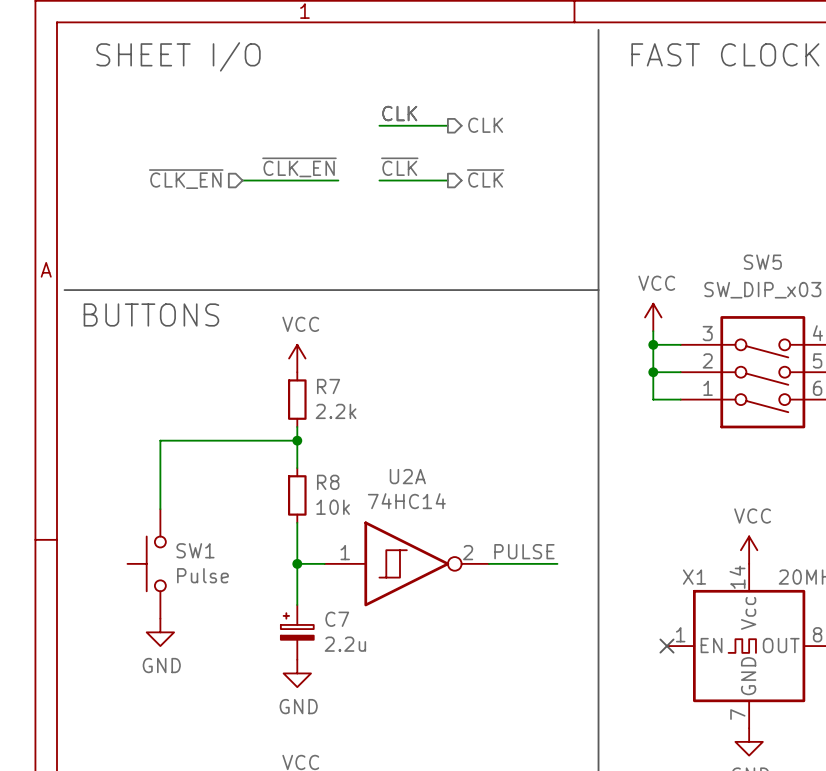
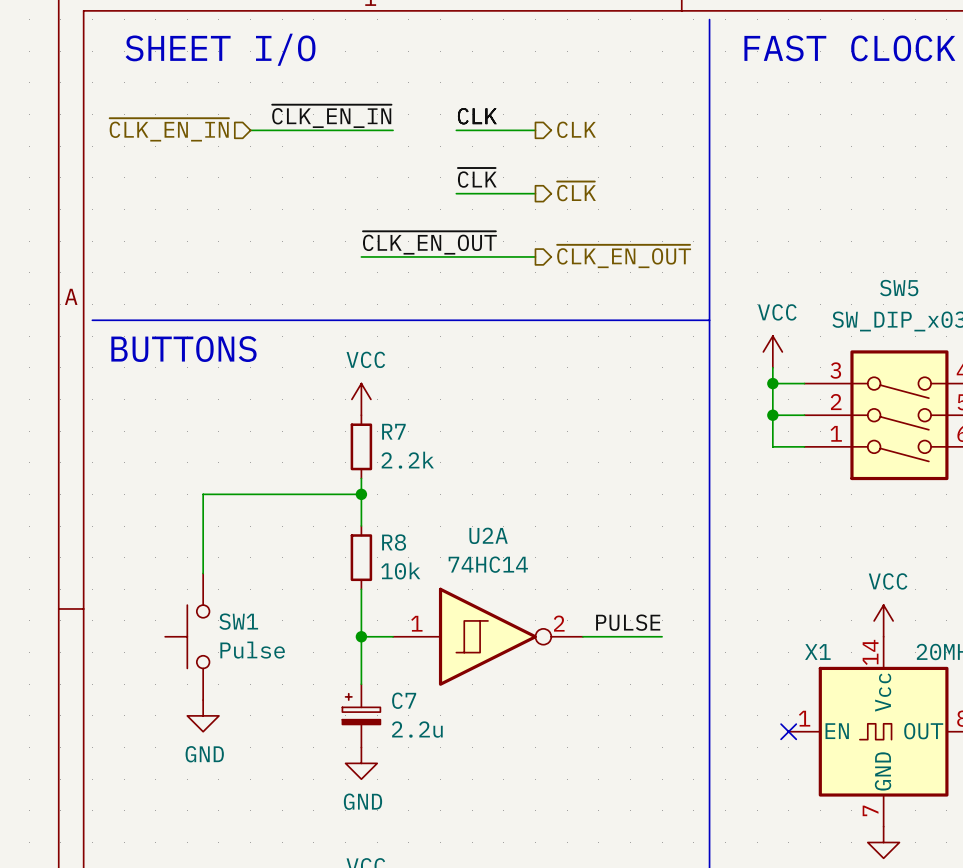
label: none -> ~{CLK_EN_IN} (331, 116)
hierarchical label: none -> ~{CLK_EN_IN} (169, 129)
wire: none -> (250, 130) (393, 130)
label: ~{CLK_EN} (299, 167) -> none
hierarchical label: ~{CLK_EN} (186, 179) -> none
wire: (242, 180) (338, 180) -> none
label: none -> ~{CLK_EN_OUT} (429, 242)
hierarchical label: none -> ~{CLK_EN_OUT} (624, 256)
wire: none -> (361, 256) (535, 256)

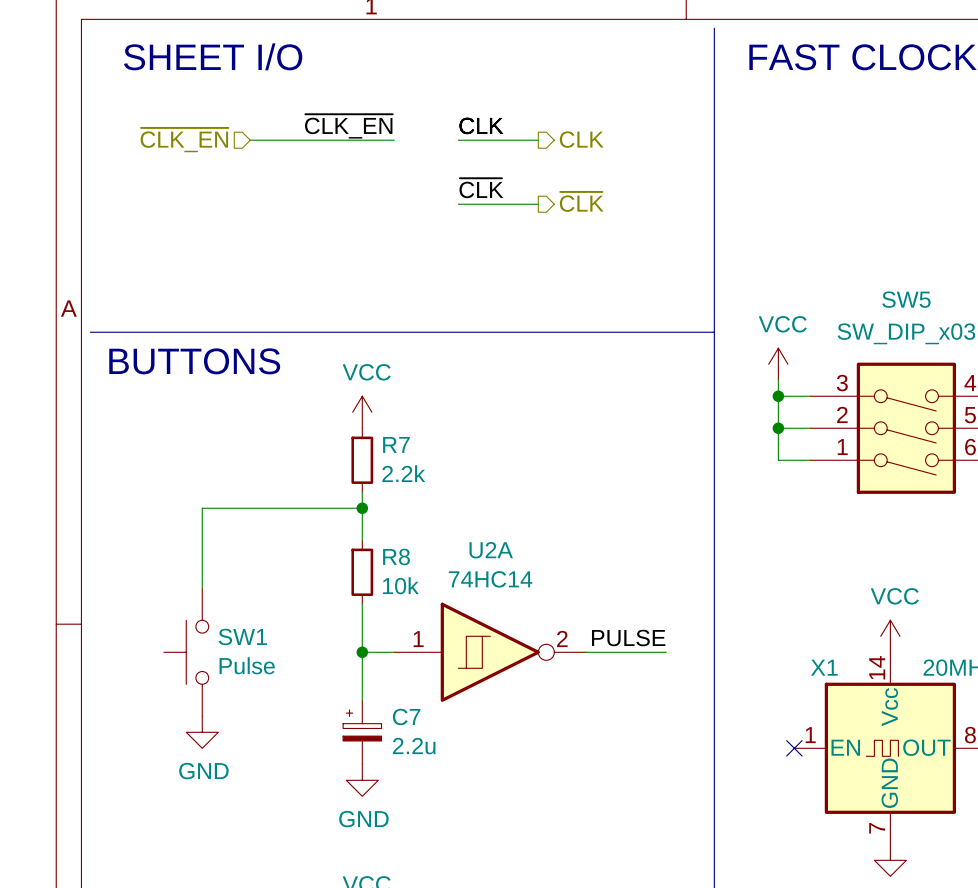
label: ~{CLK_EN_IN} (331, 116) -> ~{CLK_EN} (348, 126)
hierarchical label: ~{CLK_EN_IN} (169, 129) -> ~{CLK_EN} (184, 140)
label: ~{CLK_EN_OUT} (429, 242) -> none
wire: (361, 256) (535, 256) -> none
hierarchical label: ~{CLK_EN_OUT} (624, 256) -> none

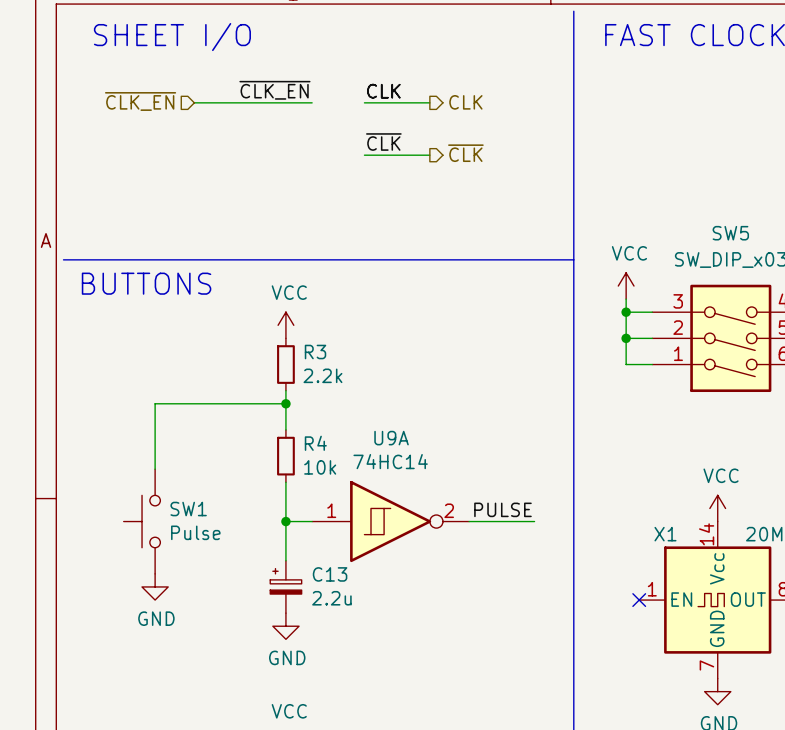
R7 name: R7 (396, 444) -> R3 (315, 352)
U2A name: U2A (491, 550) -> U9A (391, 438)
R8 name: R8 (396, 556) -> R4 (315, 443)
C7 name: C7 (406, 716) -> C13 (330, 574)

